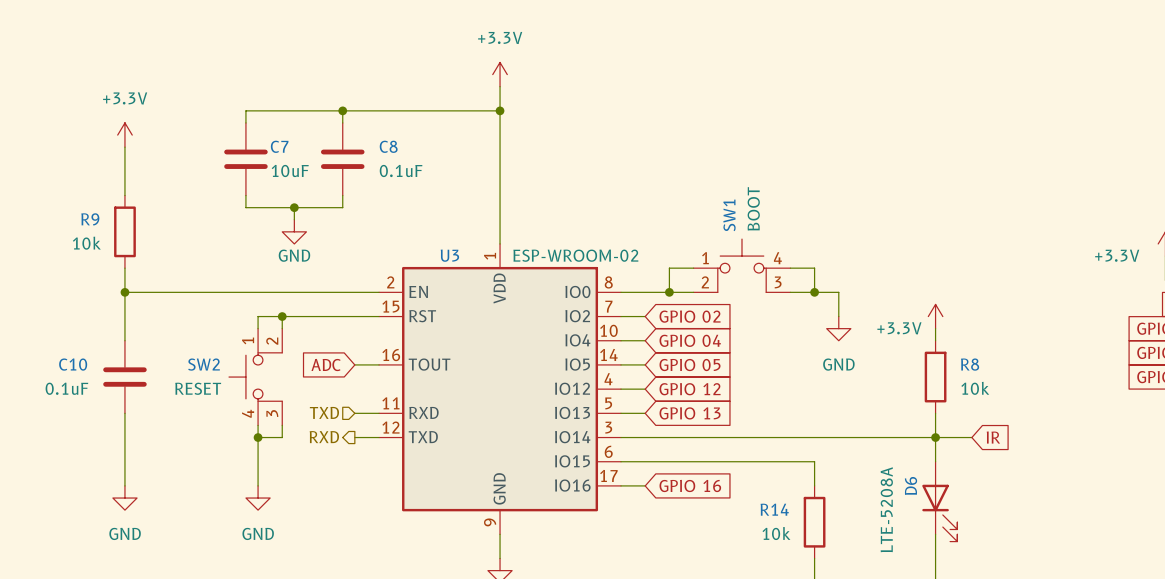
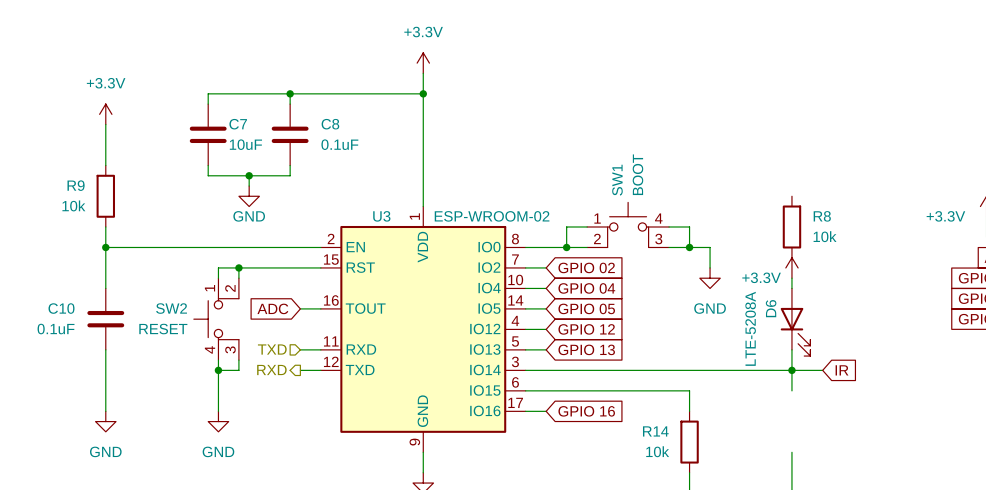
R8 position: (935, 377) -> (791, 227)
D6 position: (939, 501) -> (795, 322)

